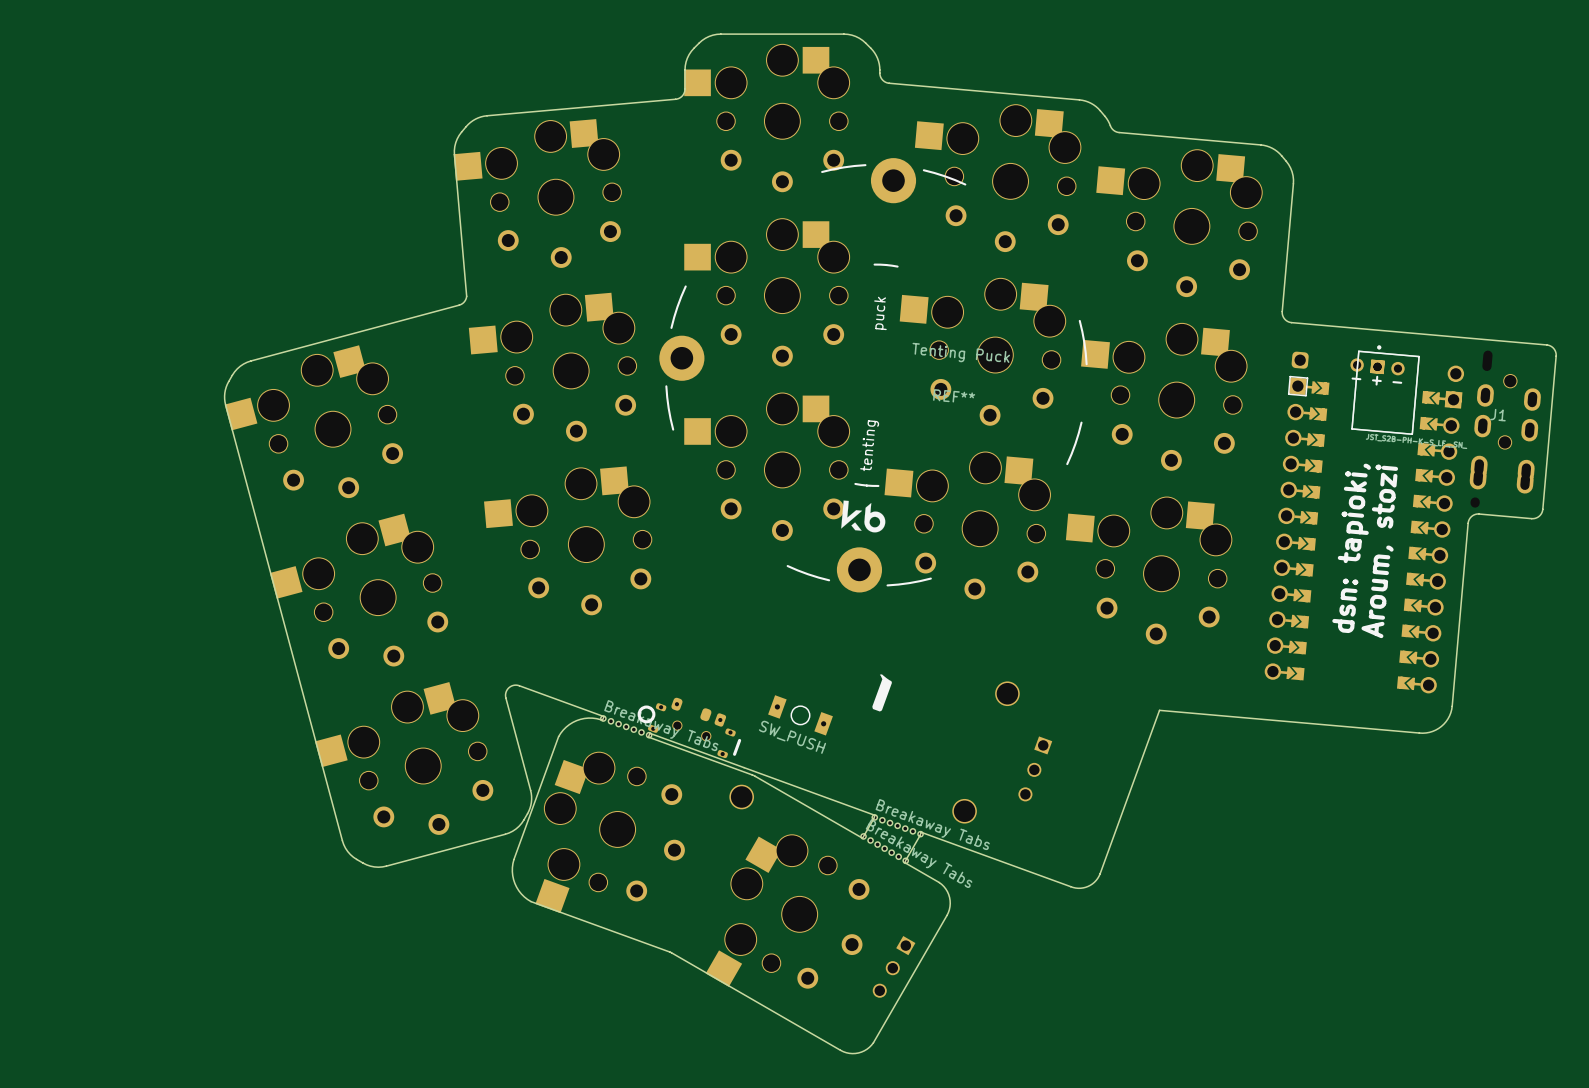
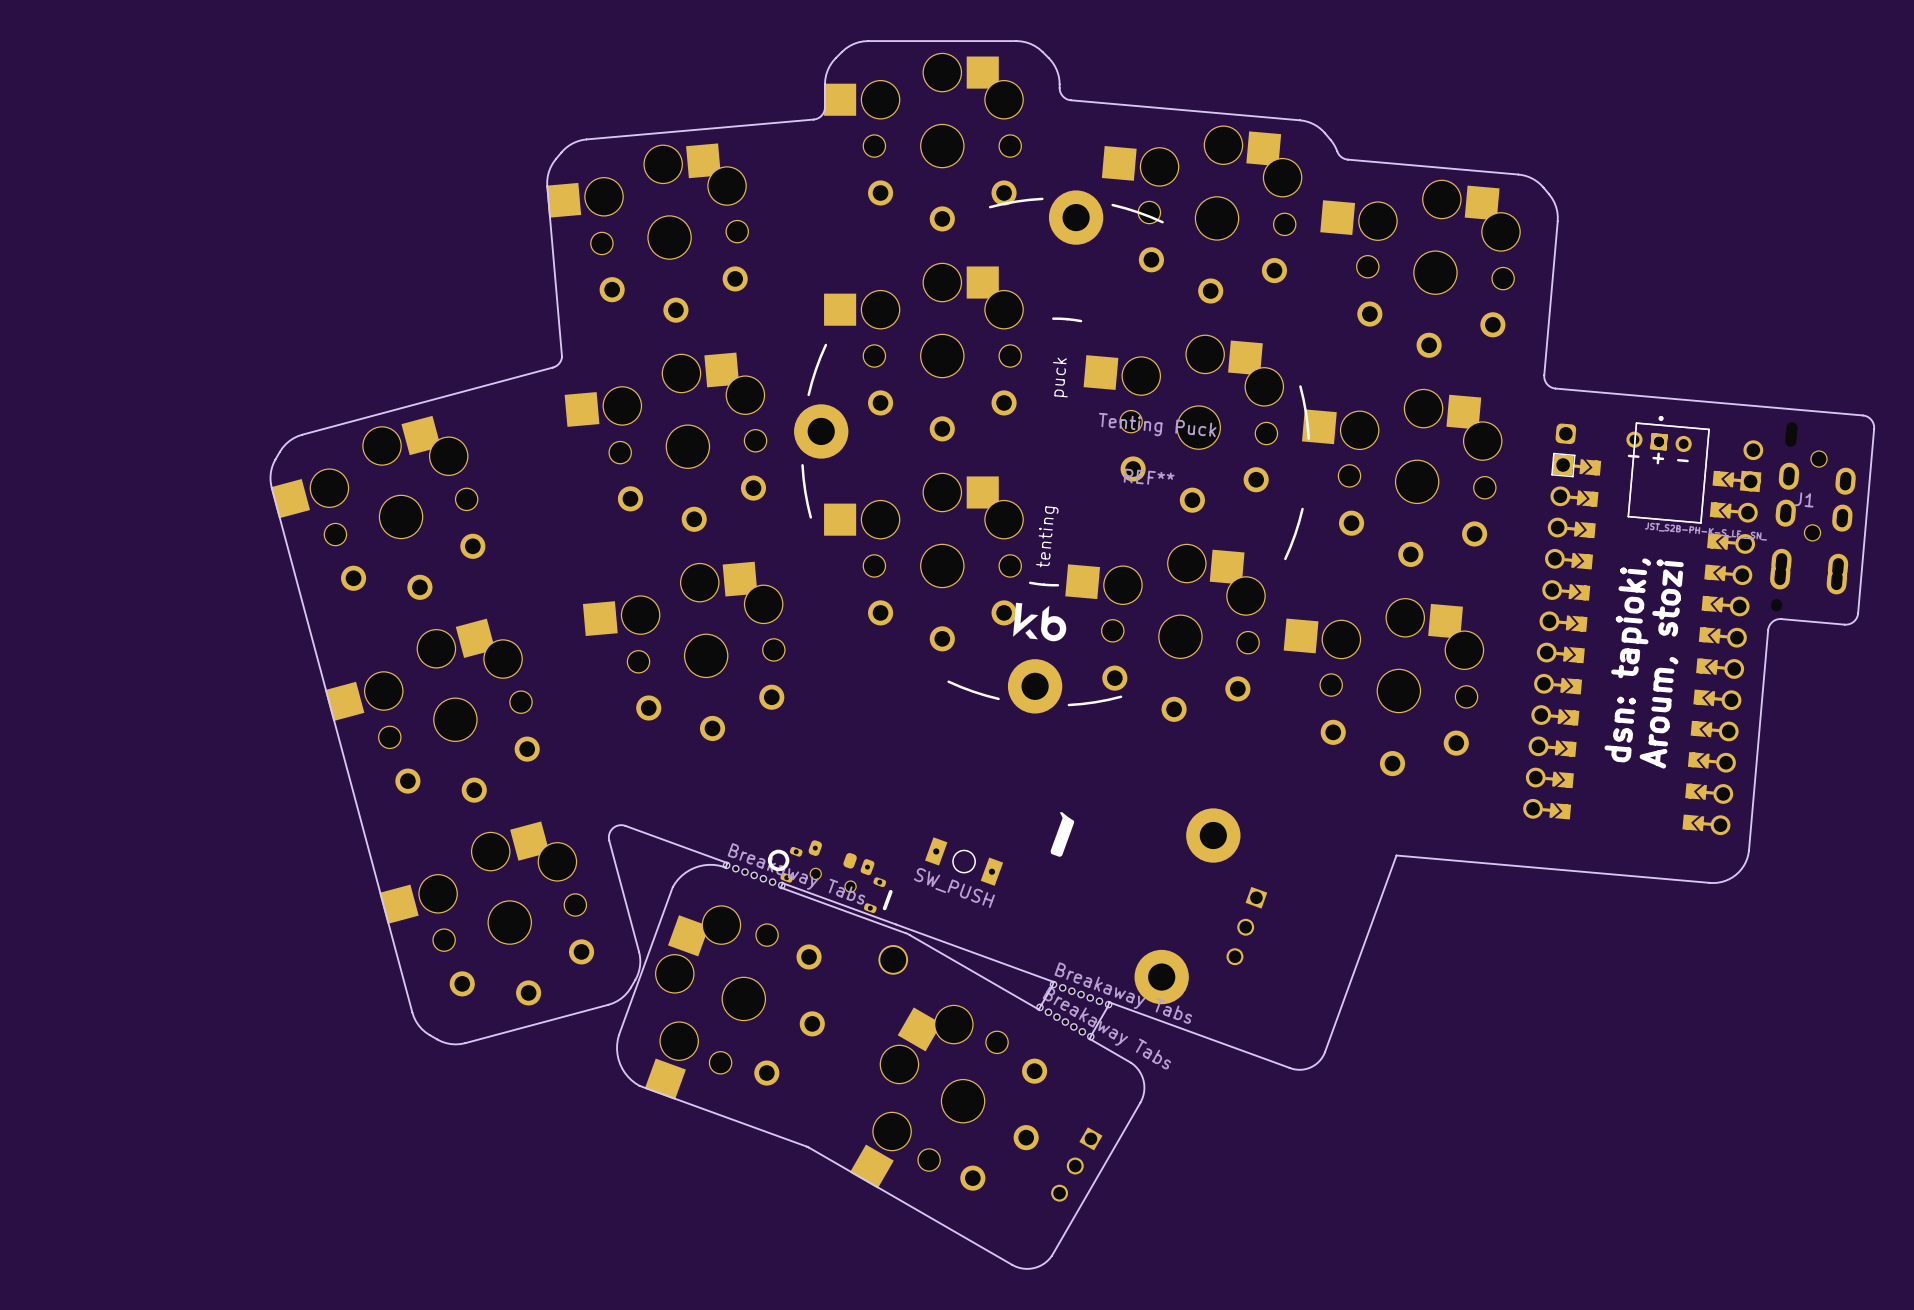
part footprint: [995, 681, 1020, 707] -> [1186, 808, 1241, 863]
part footprint: [952, 798, 977, 824] -> [1134, 949, 1189, 1005]

